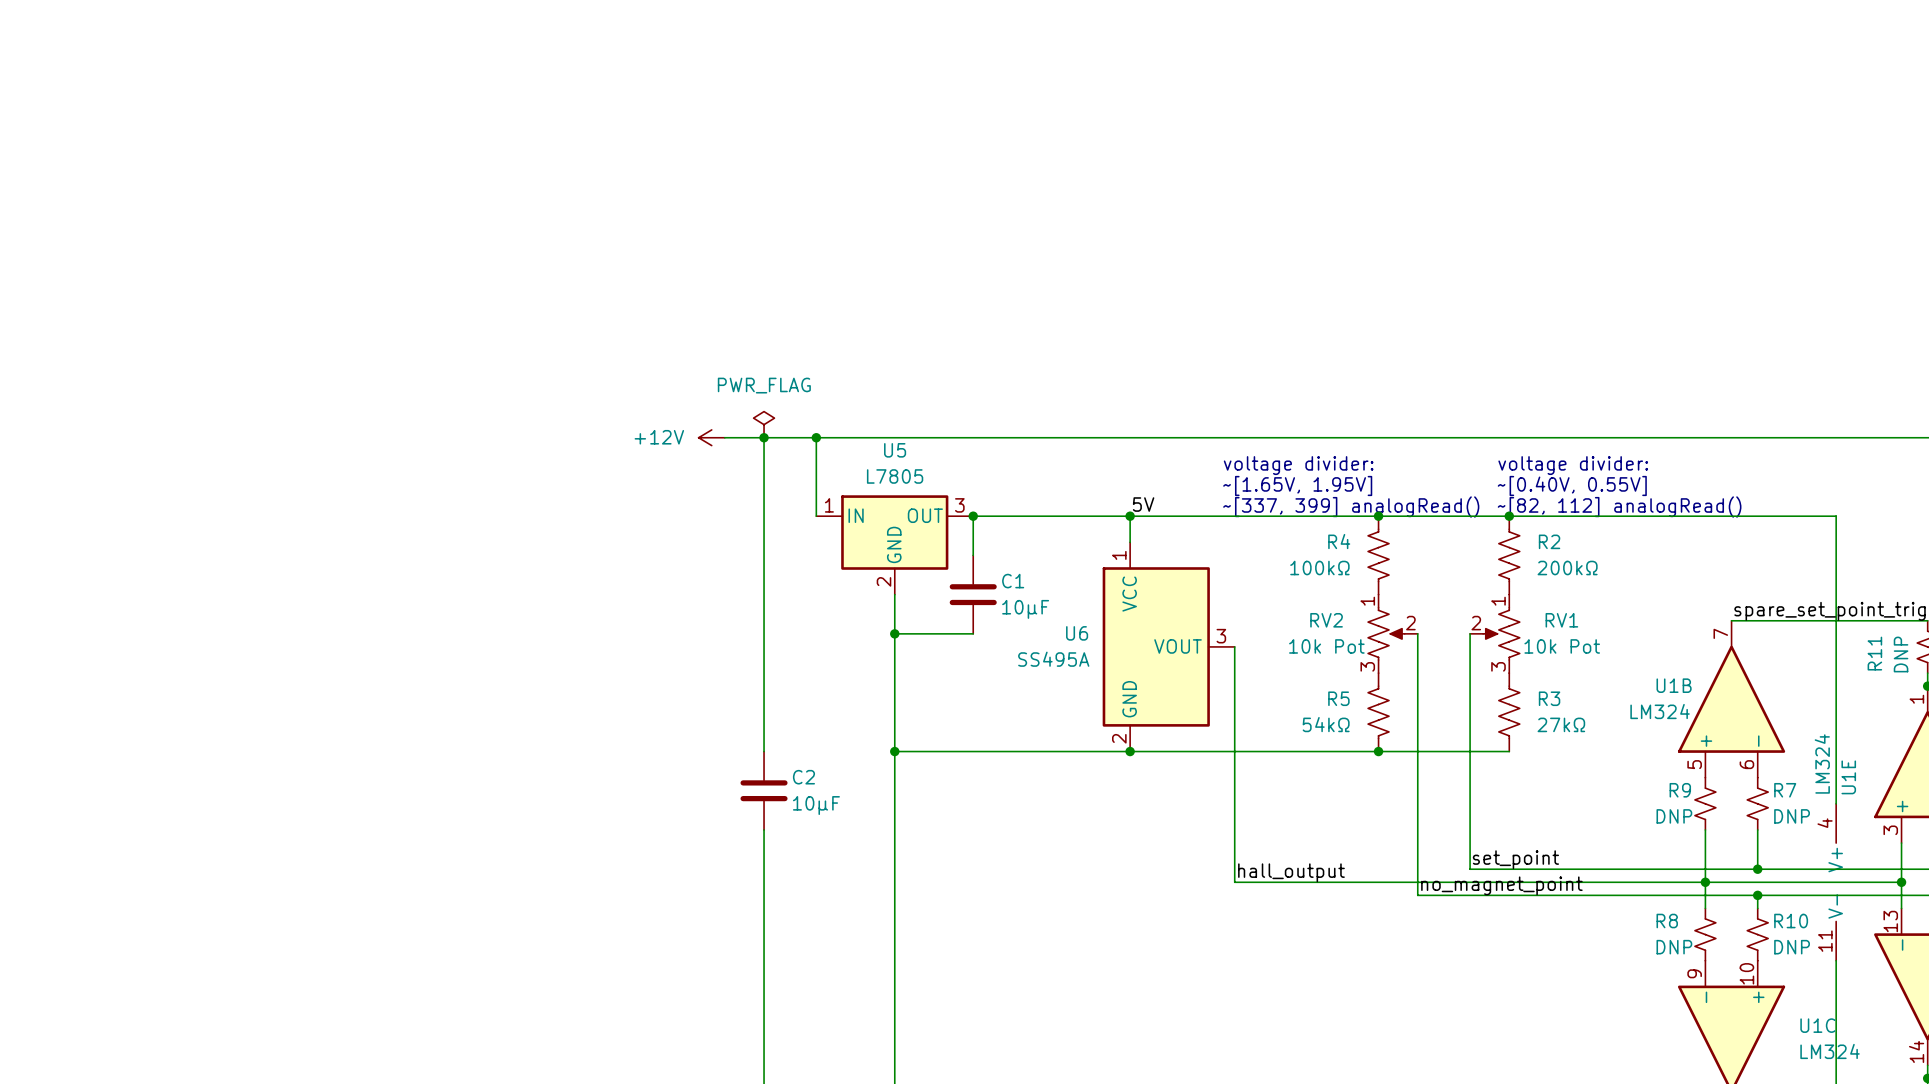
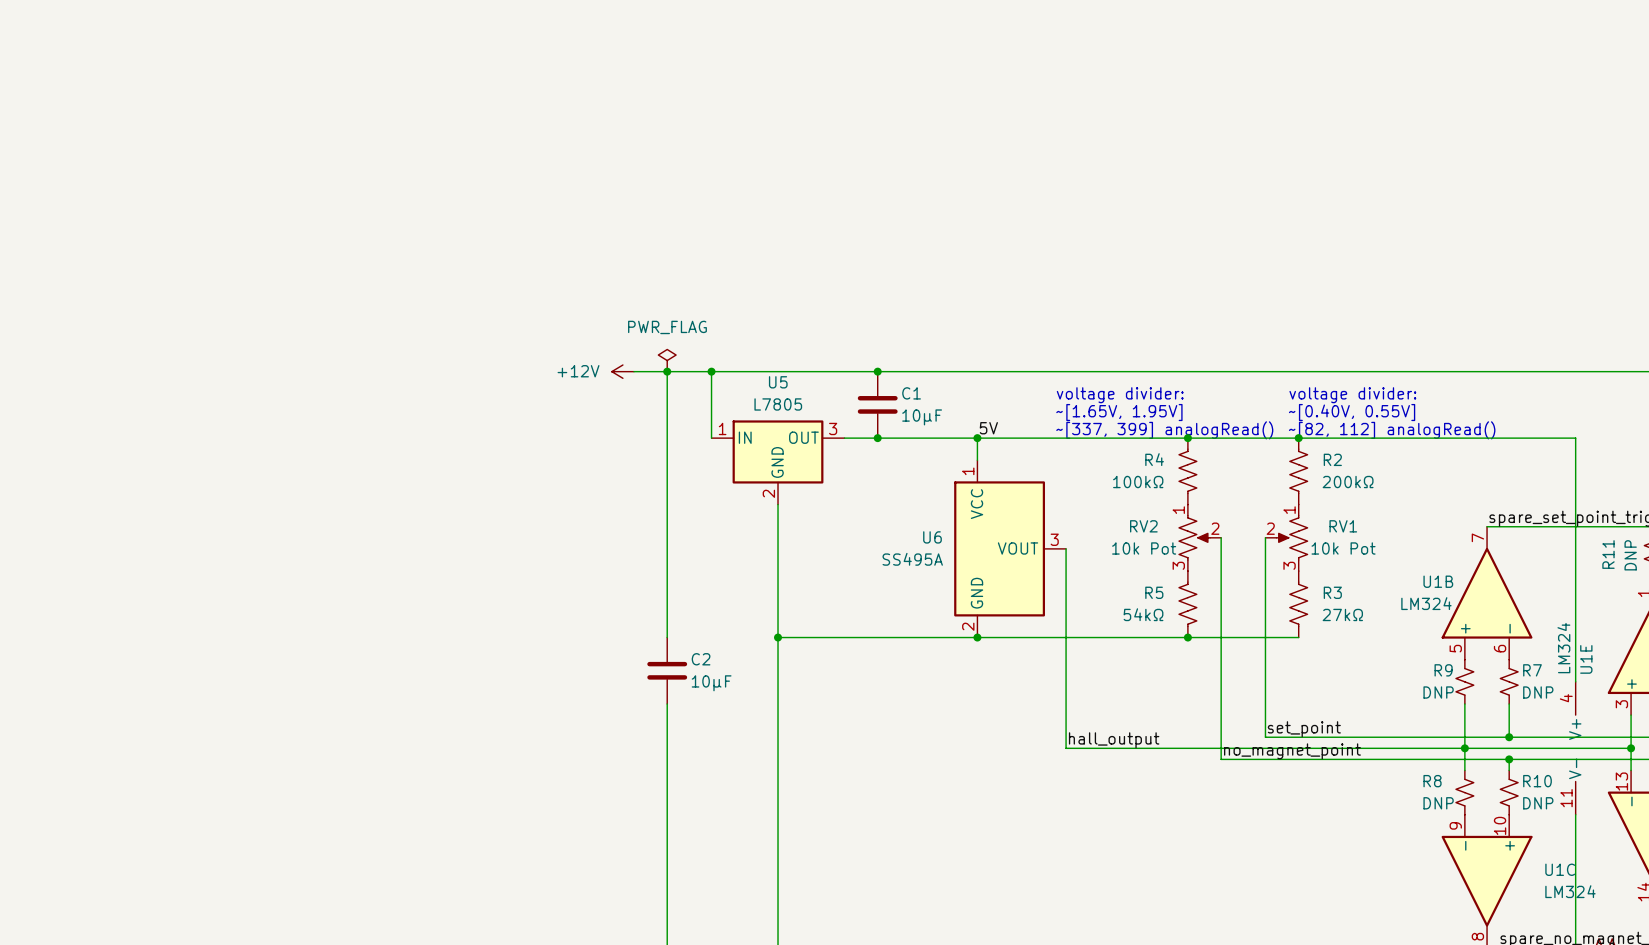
junction: none -> (877, 371)
wire: (973, 516) (973, 555) -> none
junction position: (973, 516) -> (877, 438)
C1 position: (973, 594) -> (877, 404)
wire: (894, 633) (973, 633) -> none
junction: (894, 633) -> none

